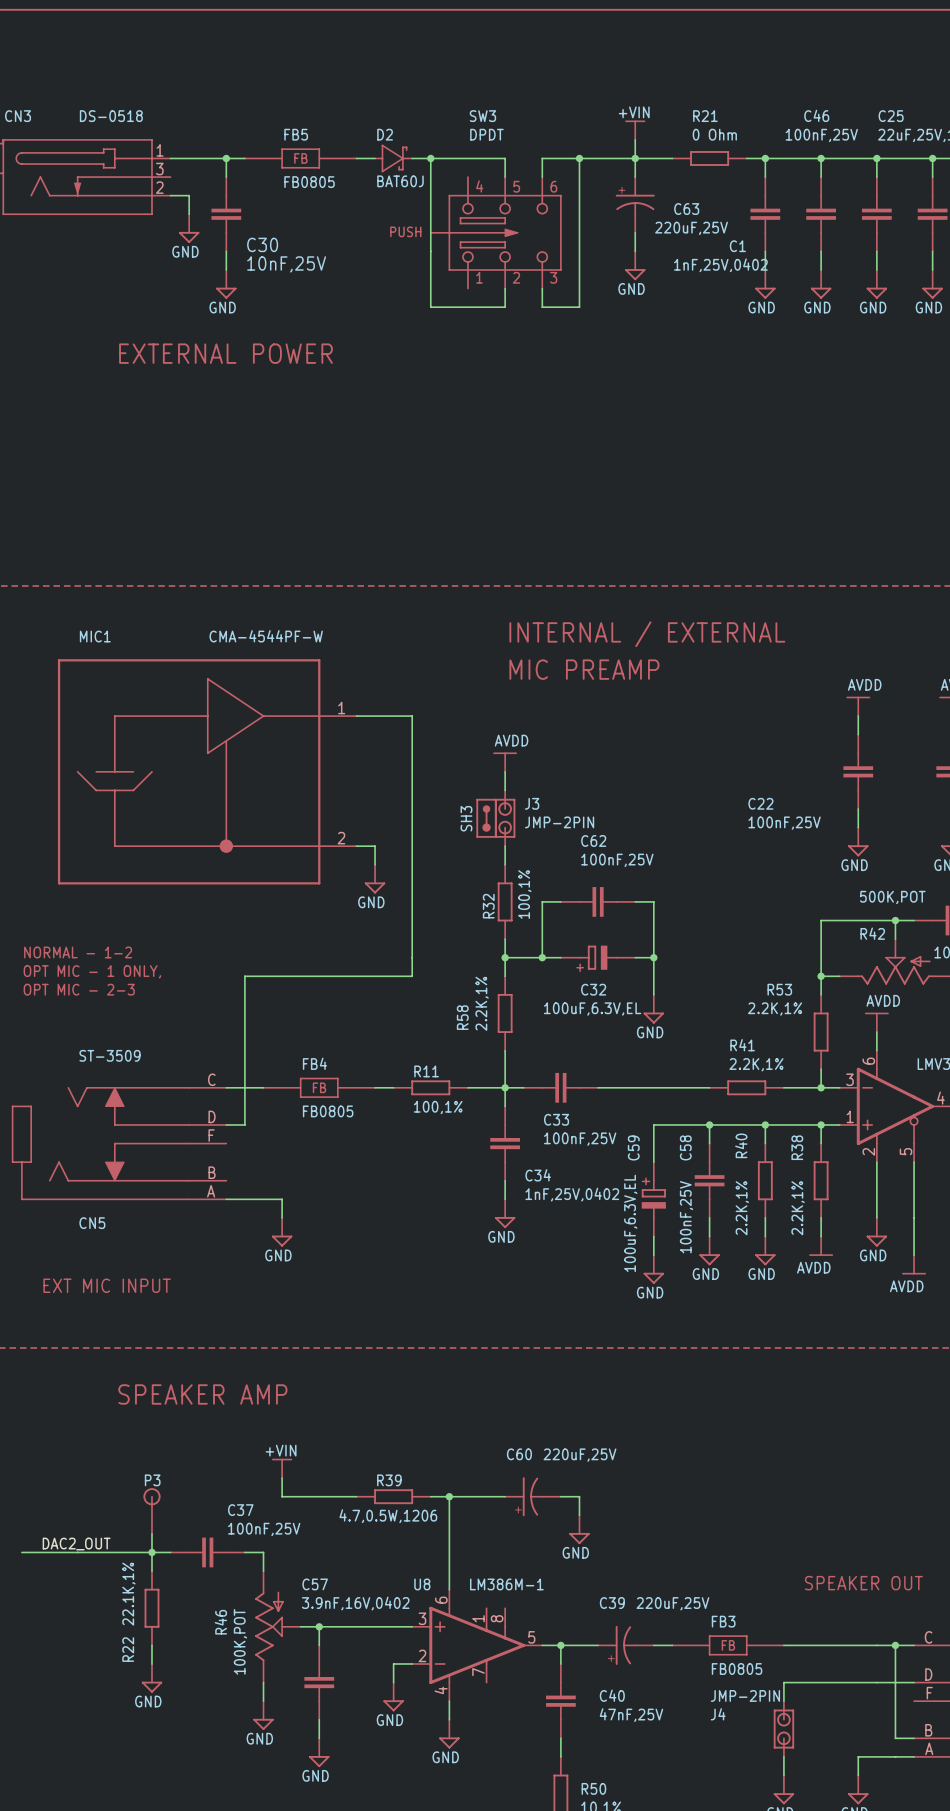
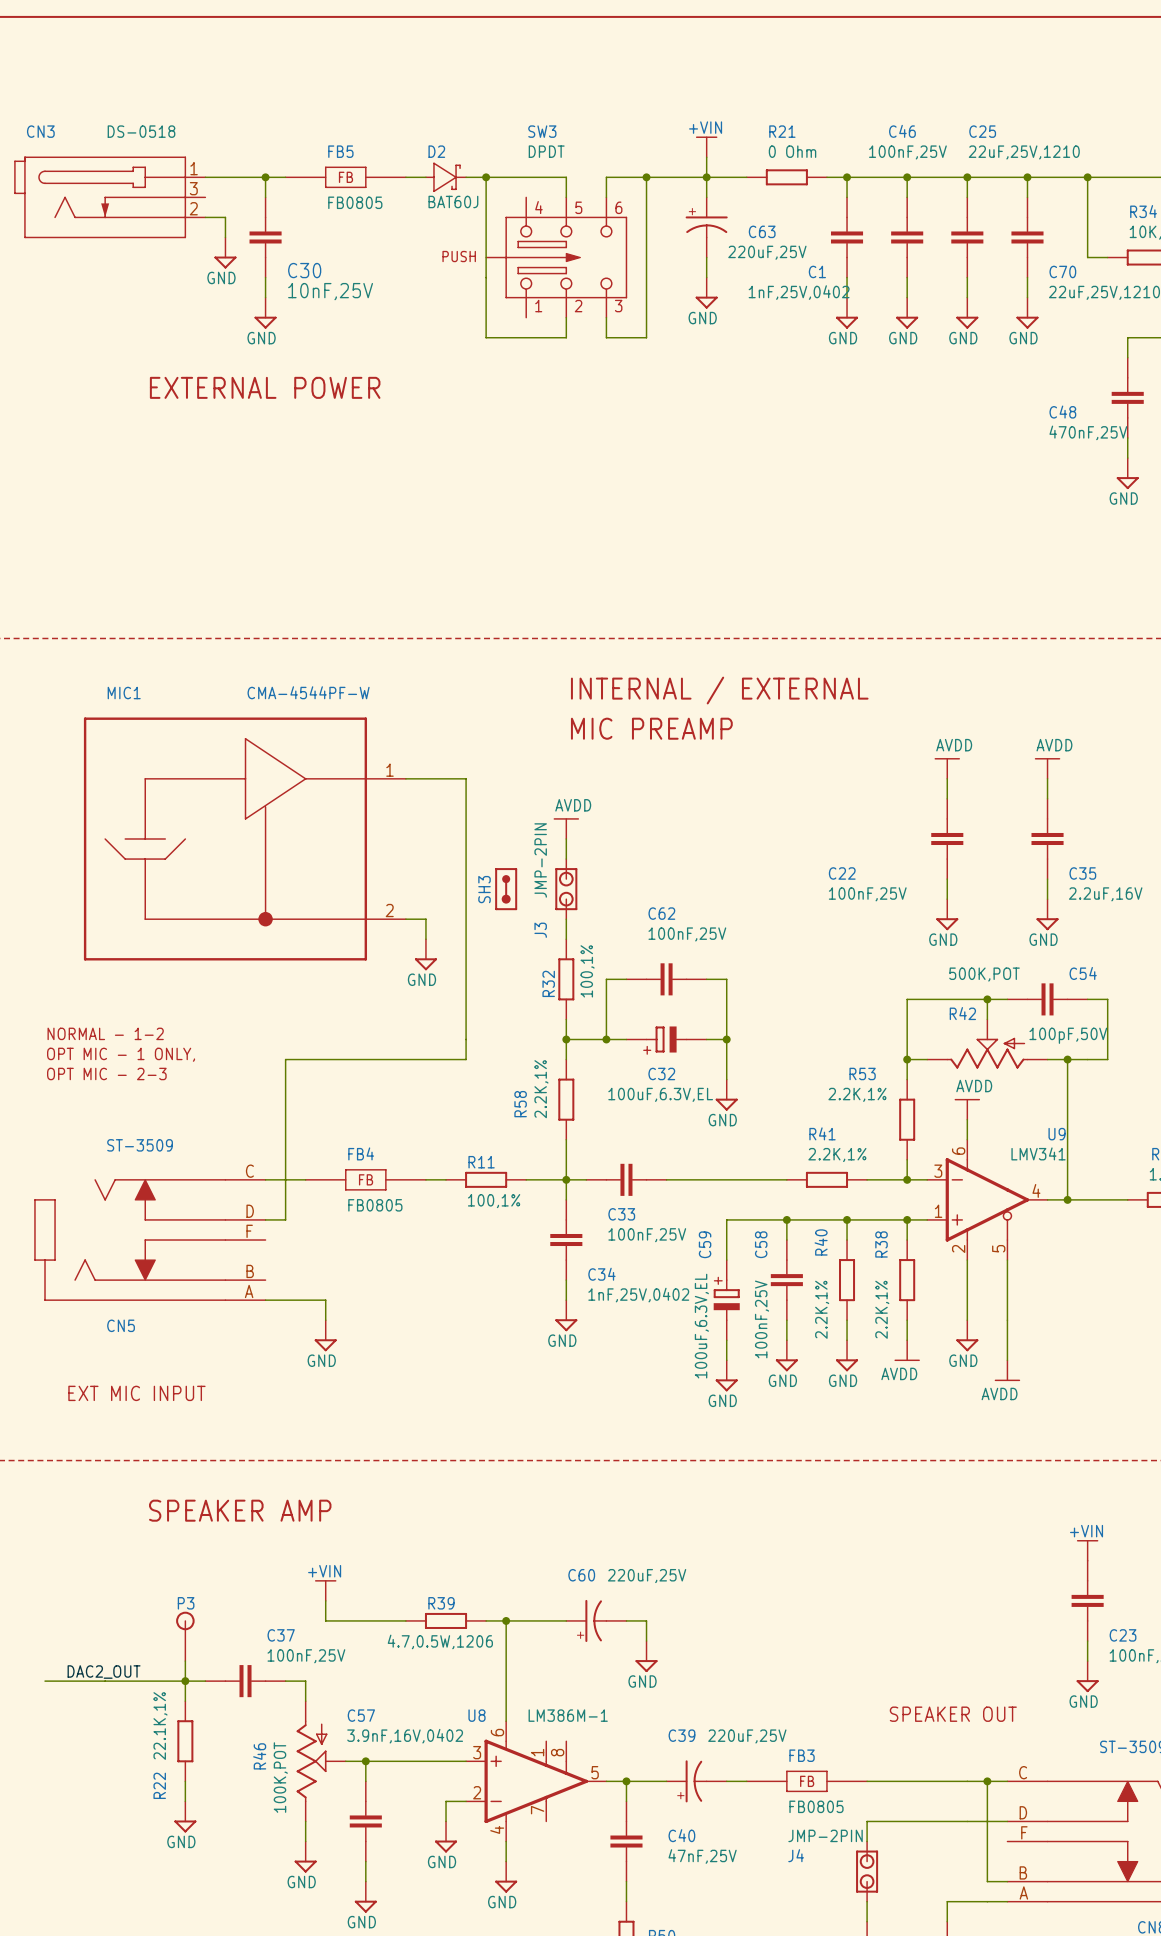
J3 name rotation: 0° (532, 803) -> 90° counterclockwise (540, 930)
J3 name position: J3 (532, 803) -> J3 (540, 930)
SH3 position: (486, 818) -> (506, 889)
J3 value rotation: 0° (559, 822) -> 90° counterclockwise (540, 860)
J3 value position: JMP-2PIN (559, 822) -> JMP-2PIN (540, 860)

